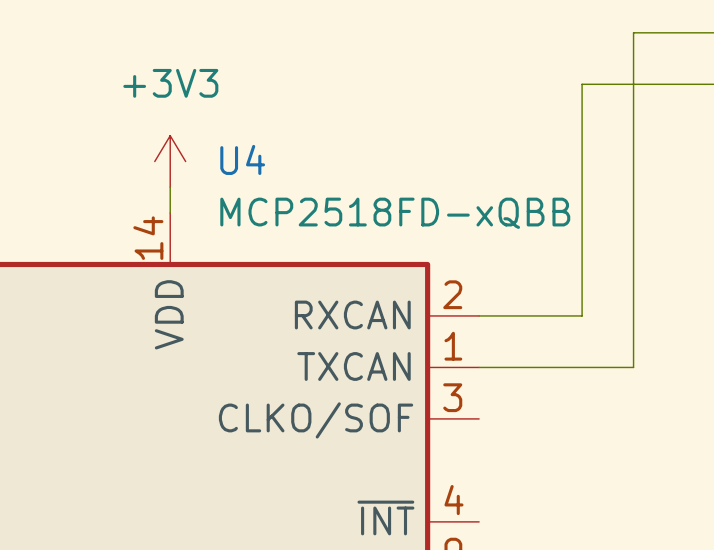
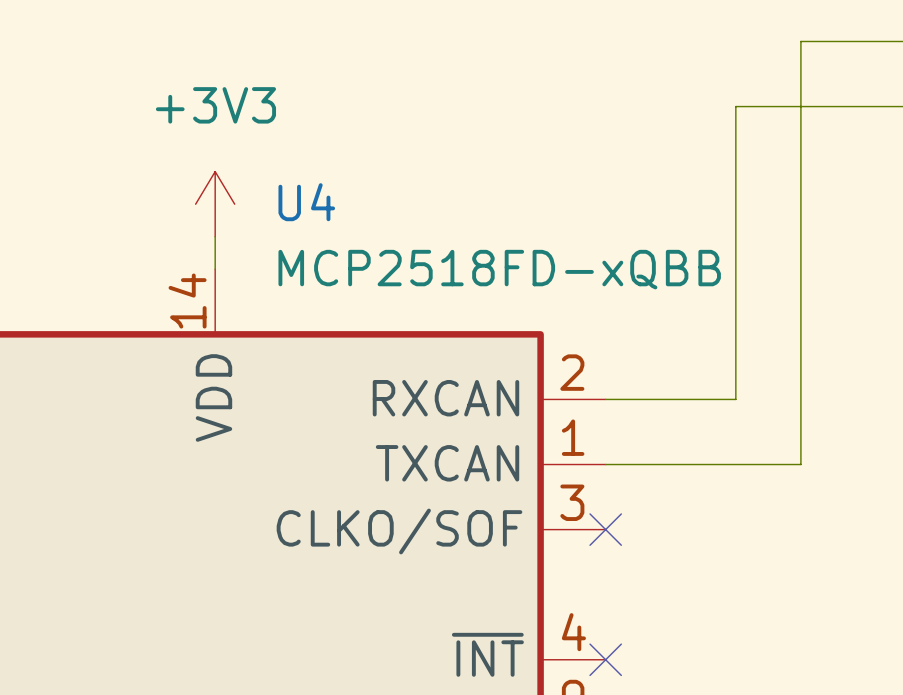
no-connect mark: none -> (605, 529)
no-connect mark: none -> (605, 659)

